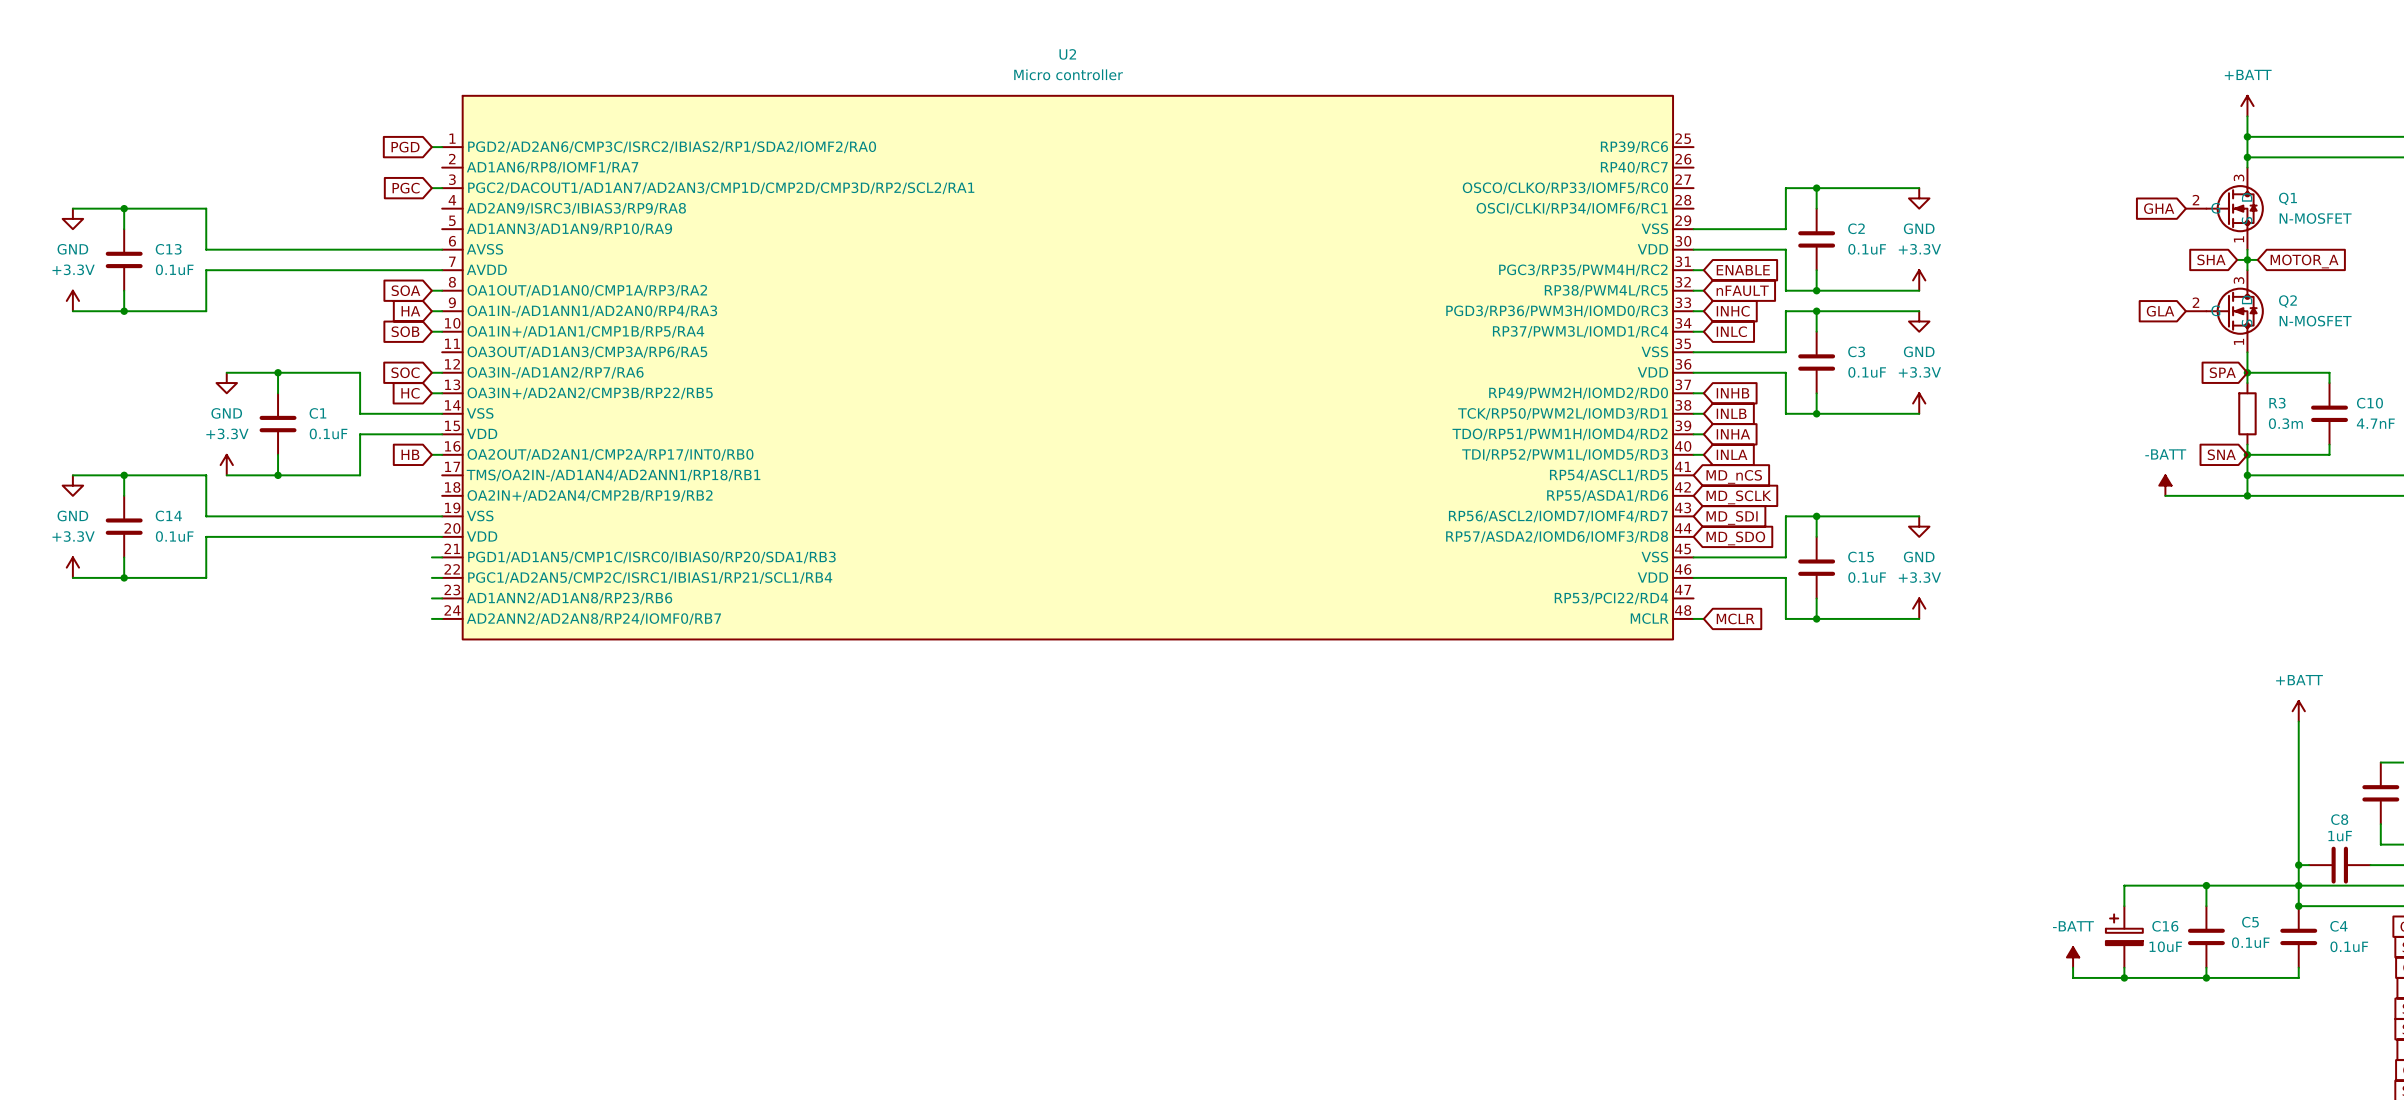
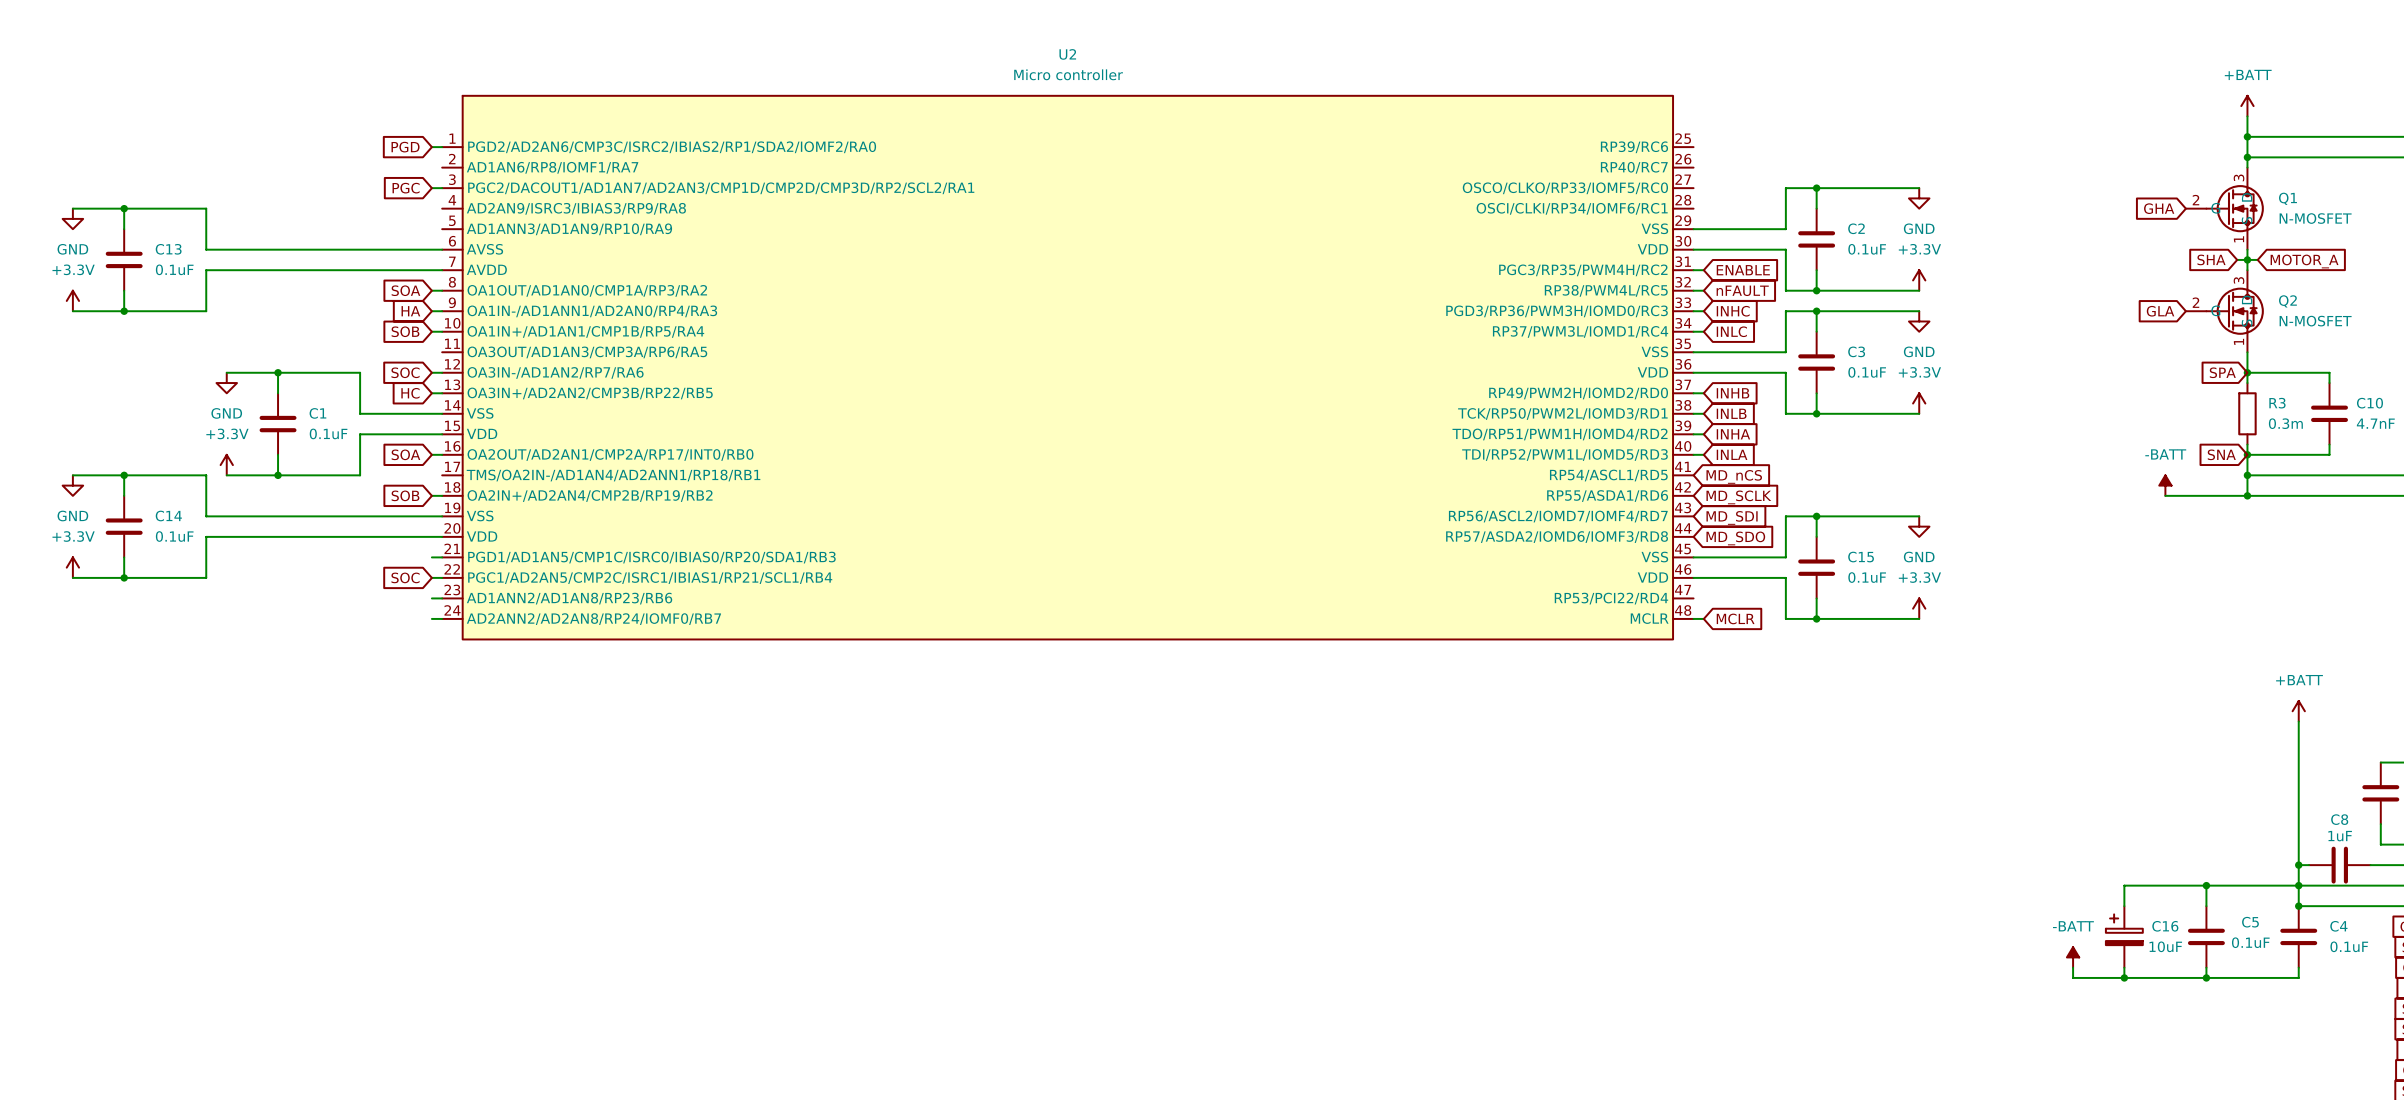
global label: HB (410, 454) -> SOA (405, 454)
global label: none -> SOB (405, 495)
wire: none -> (431, 495) (442, 495)
global label: none -> SOC (405, 577)

